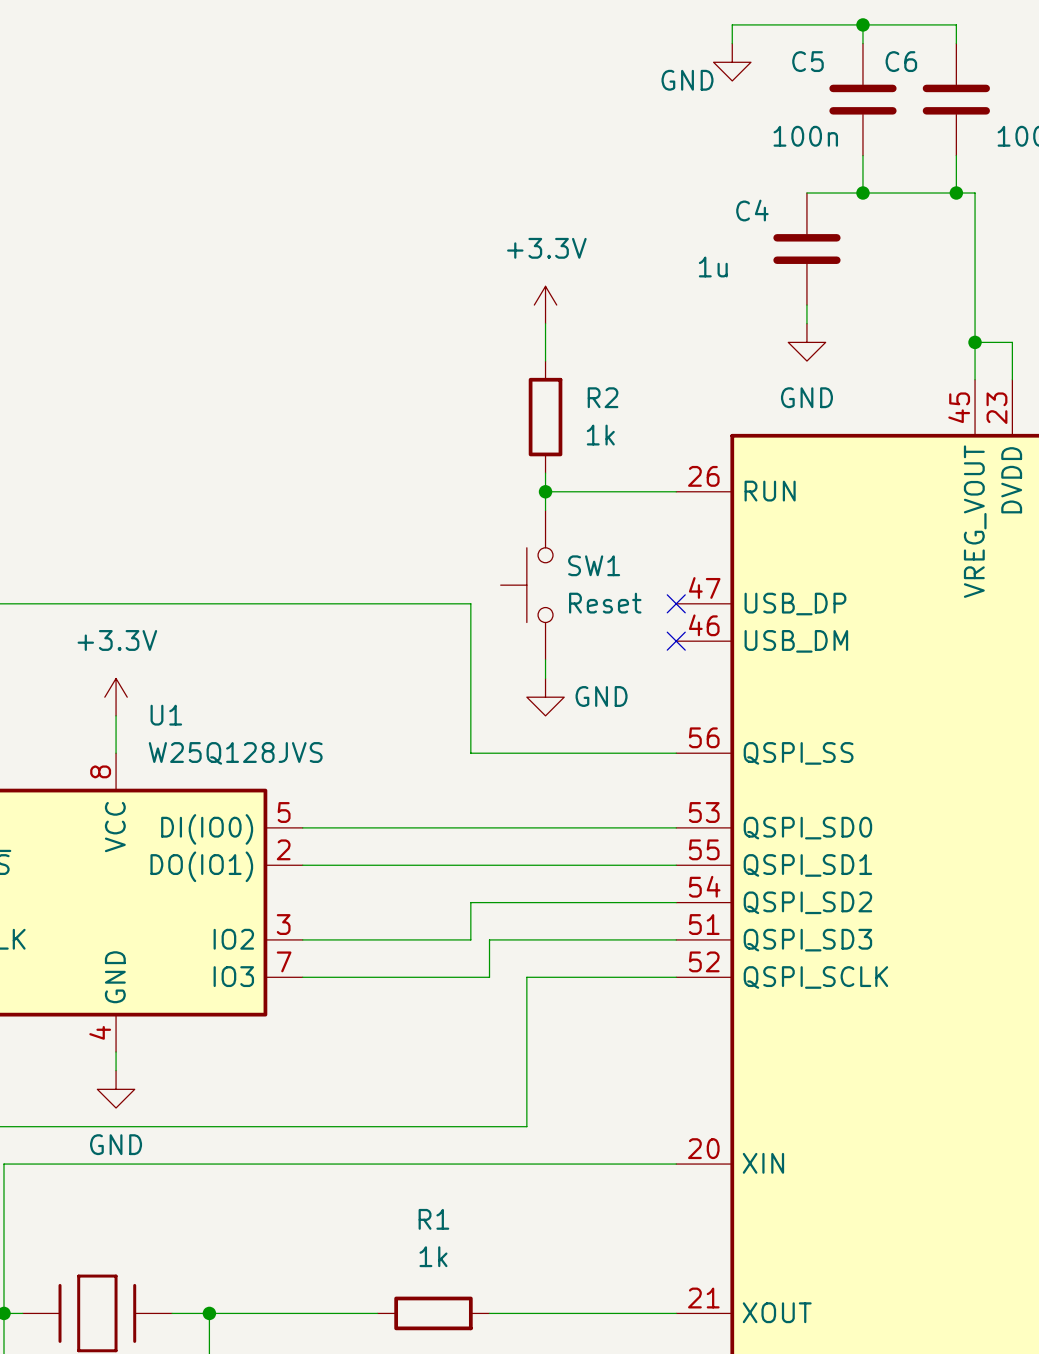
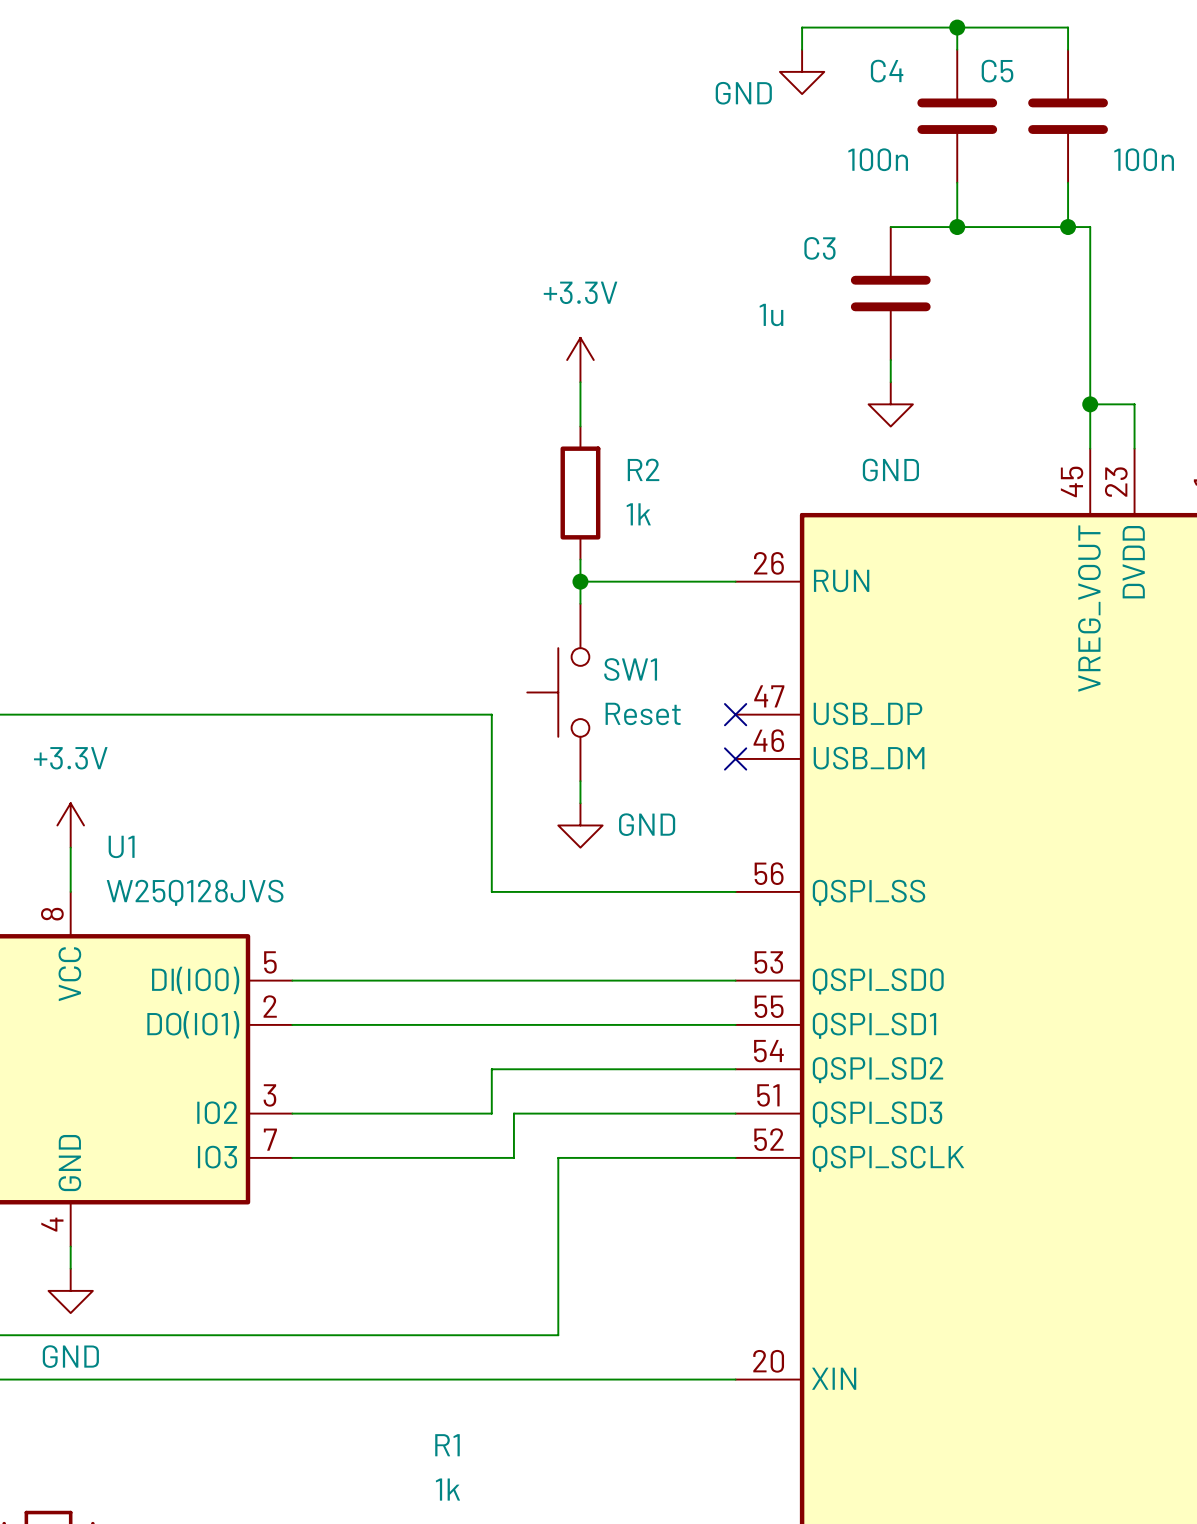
C5 name: C5 (807, 61) -> C4 (887, 71)
C6 name: C6 (901, 61) -> C5 (997, 71)
C4 name: C4 (752, 210) -> C3 (819, 248)

